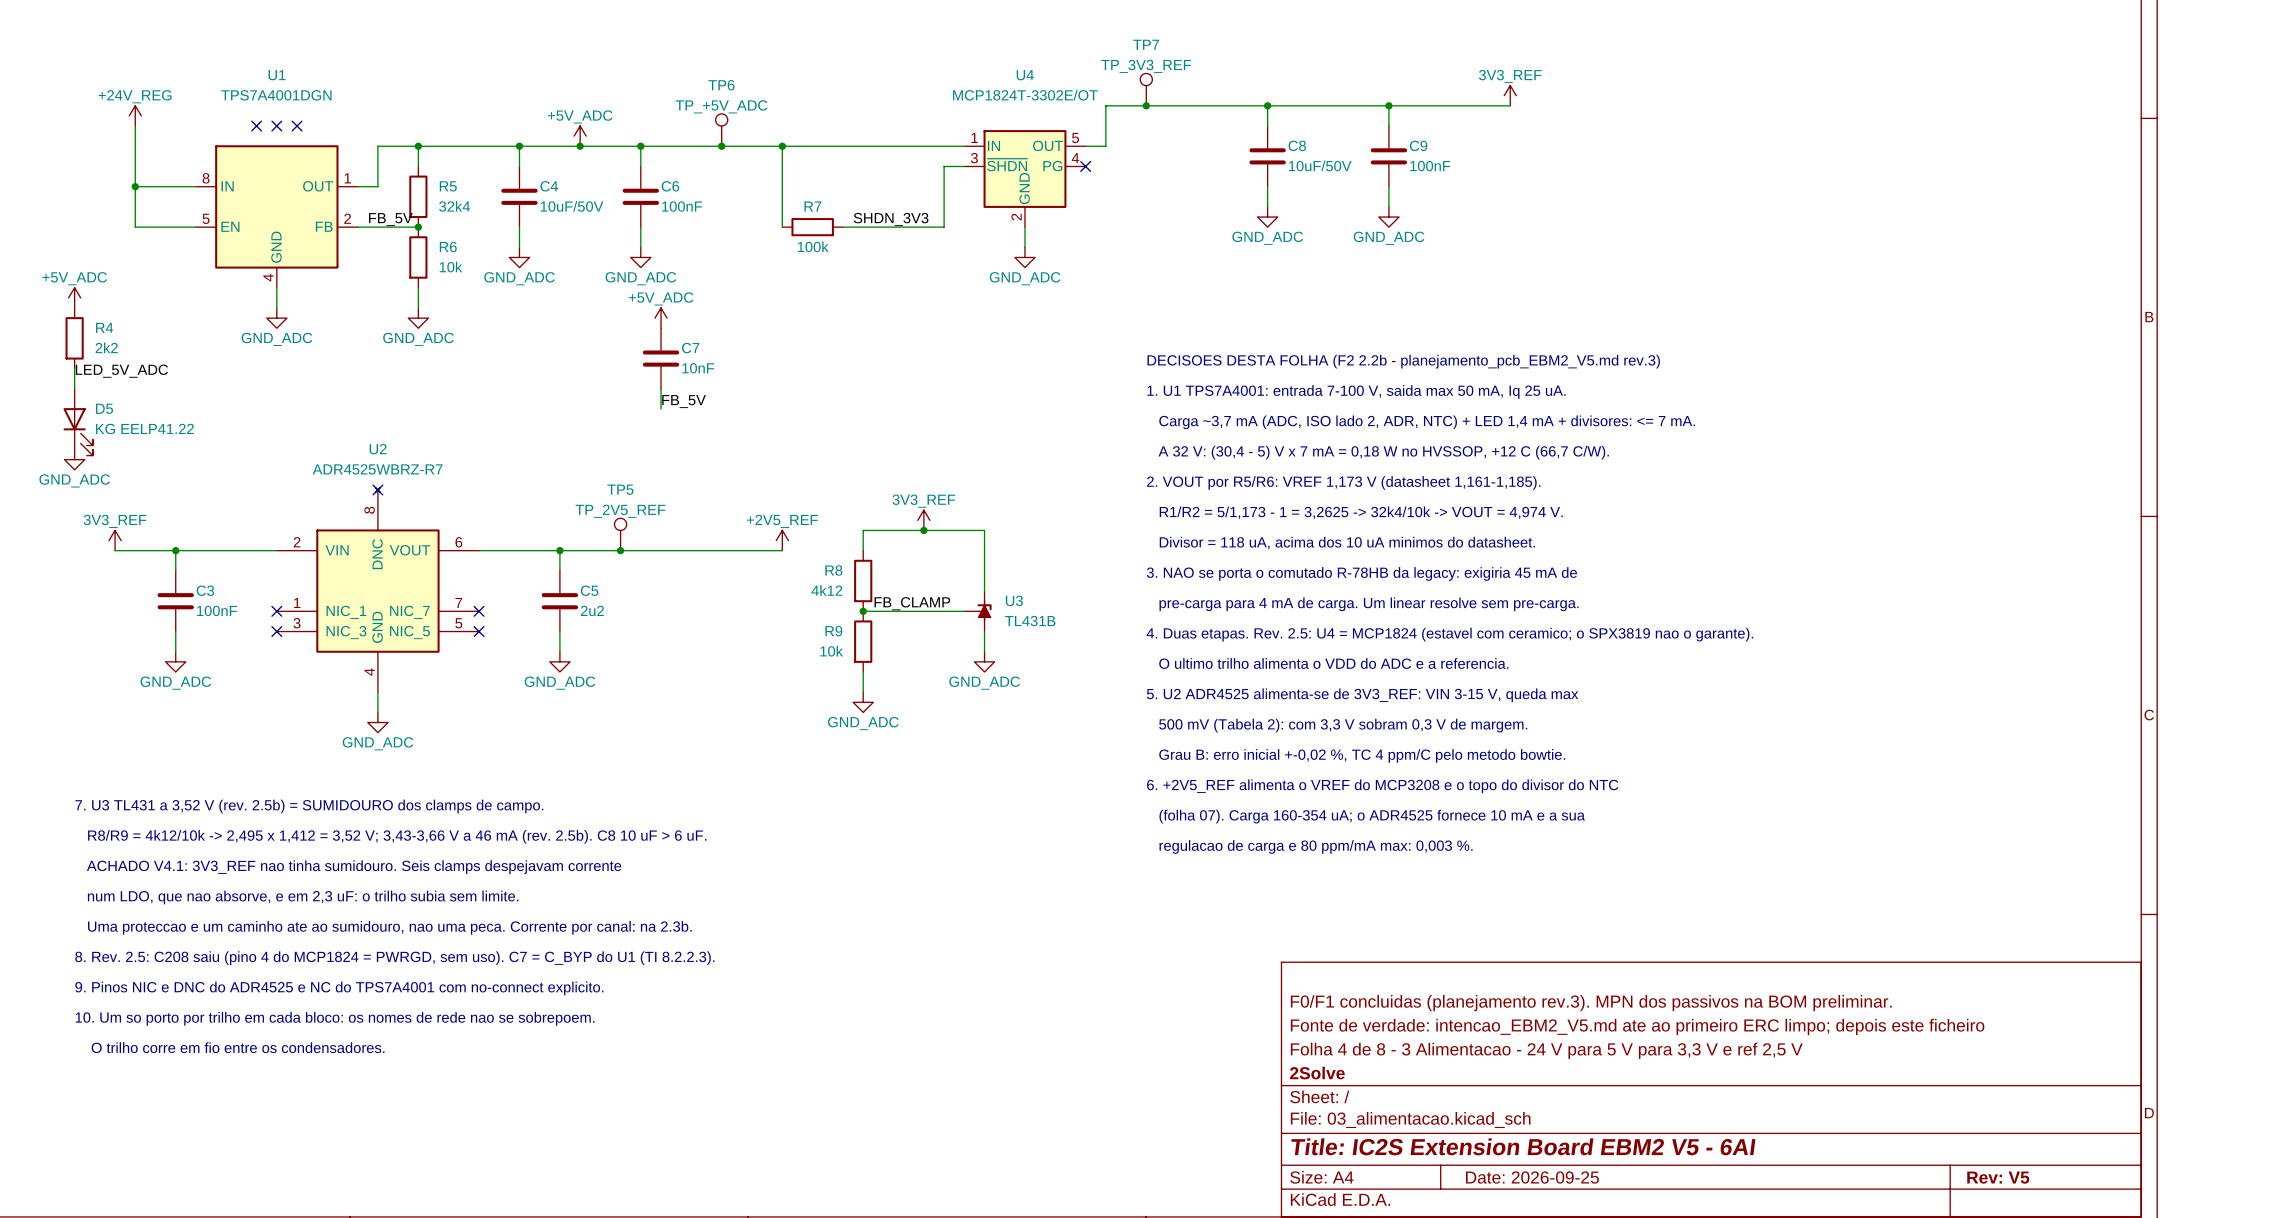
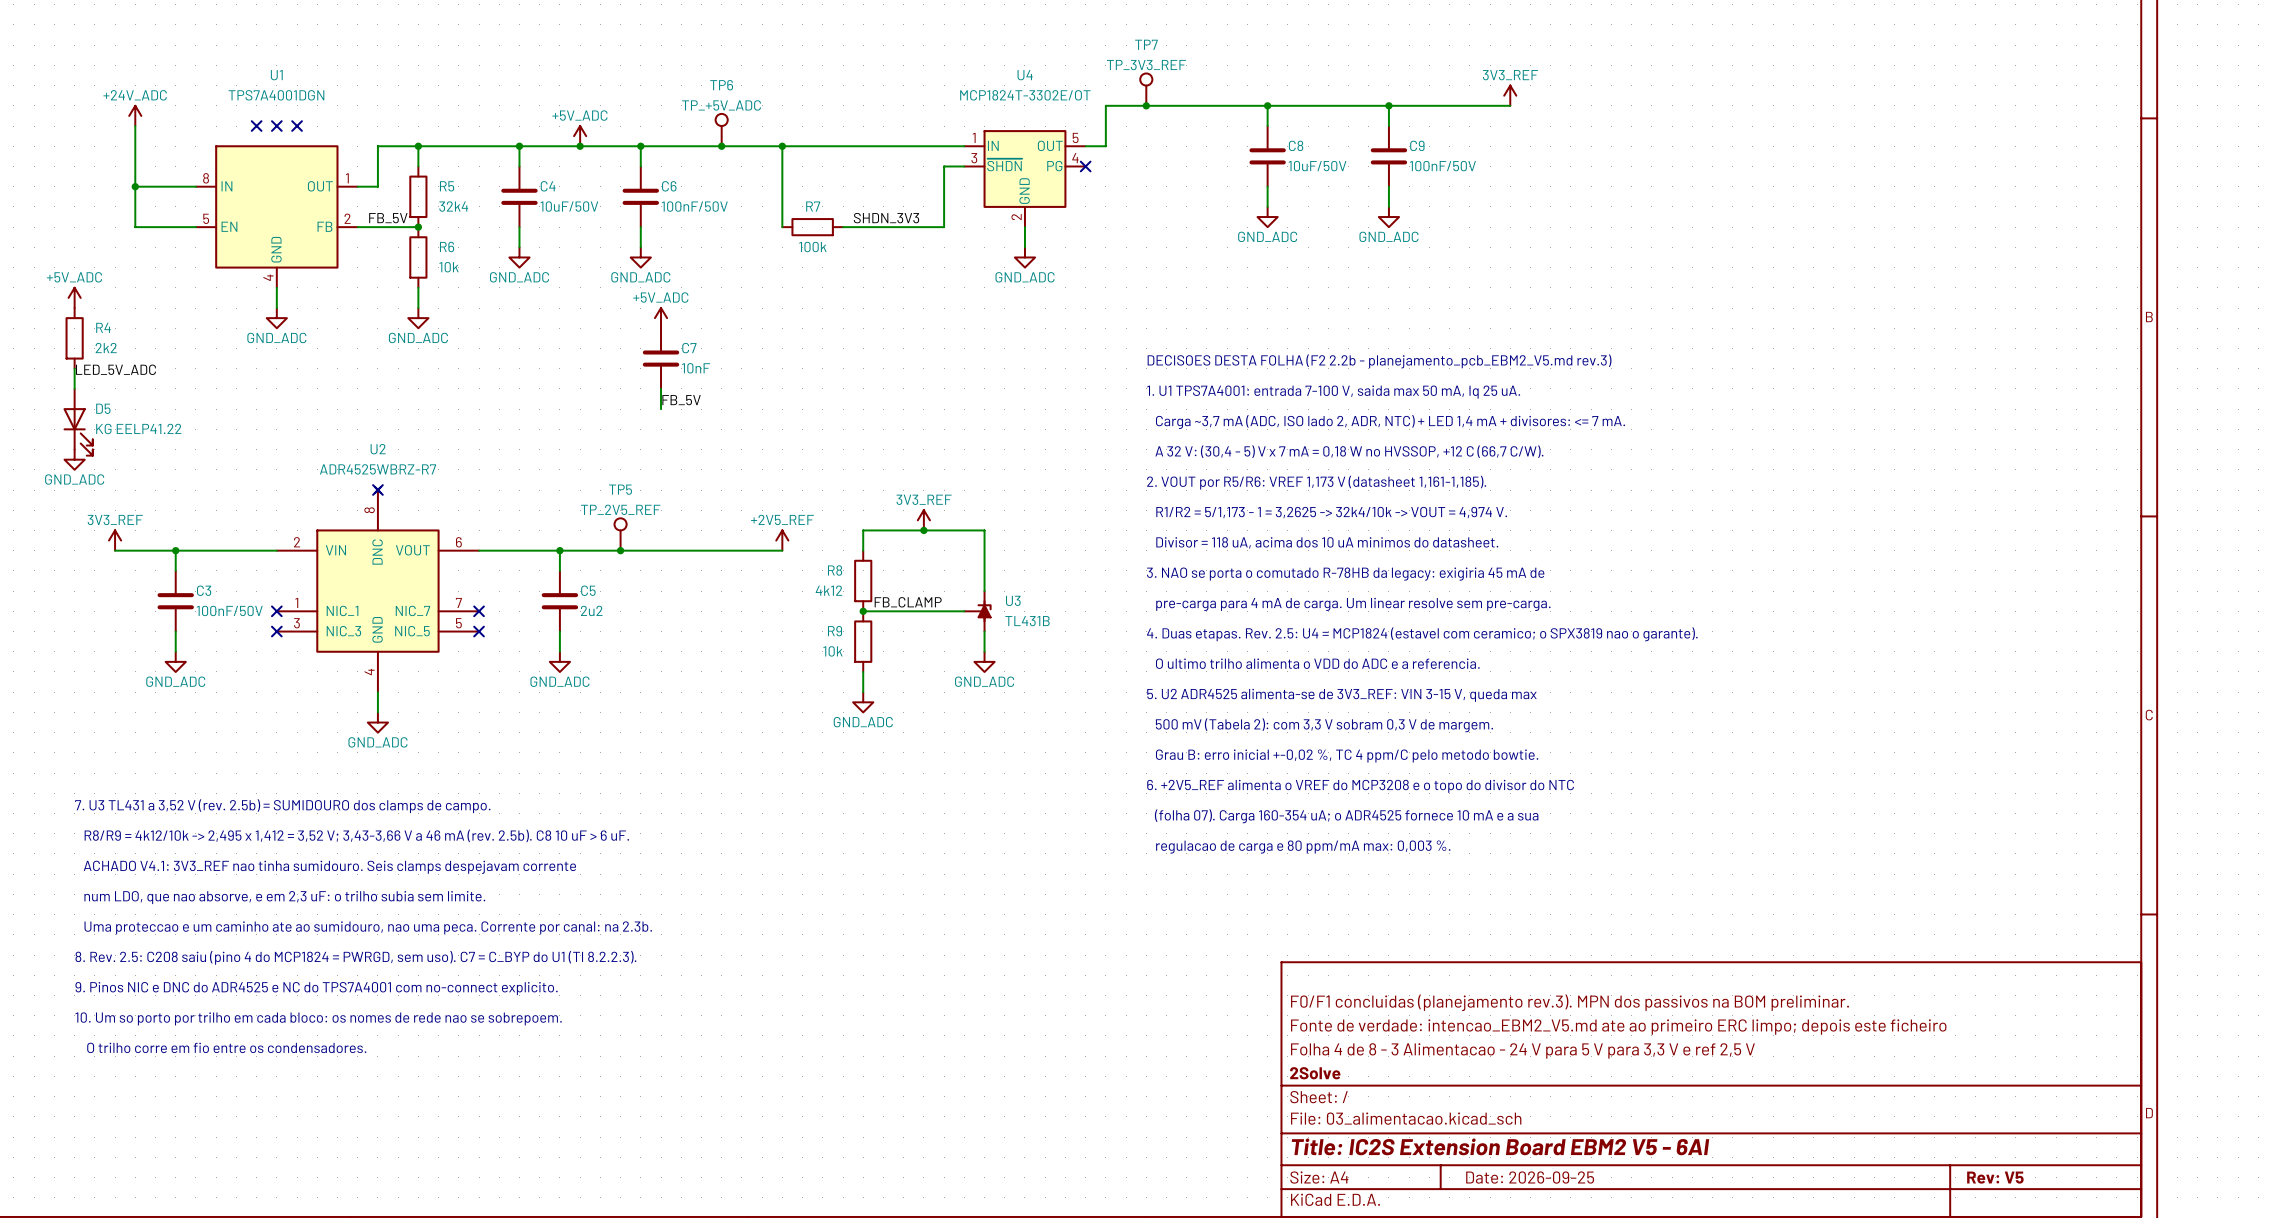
power symbol: +24V_REG (135, 115) -> +24V_ADC (135, 115)
C9 value: 100nF (1430, 166) -> 100nF/50V (1442, 166)
C6 value: 100nF (682, 206) -> 100nF/50V (694, 206)
C3 value: 100nF (217, 610) -> 100nF/50V (229, 610)

